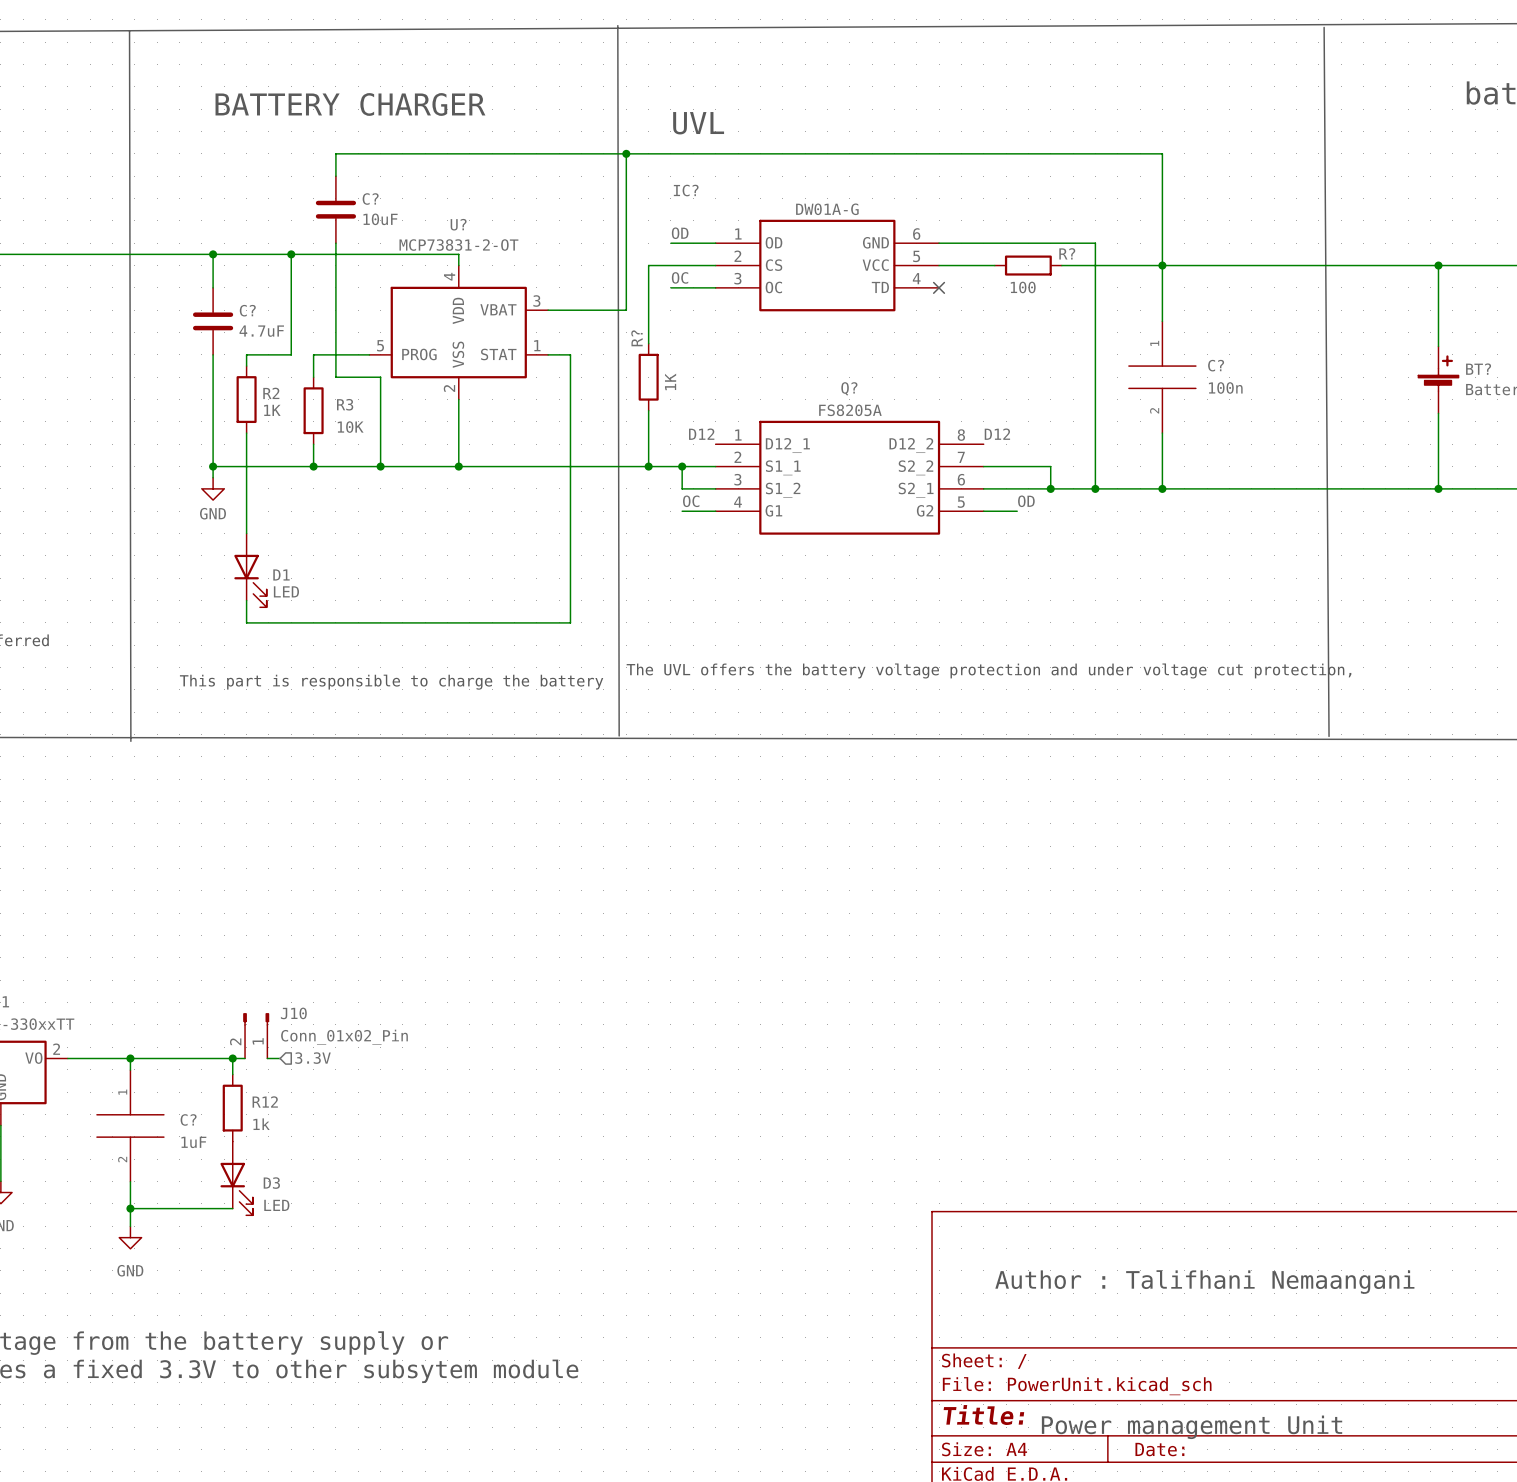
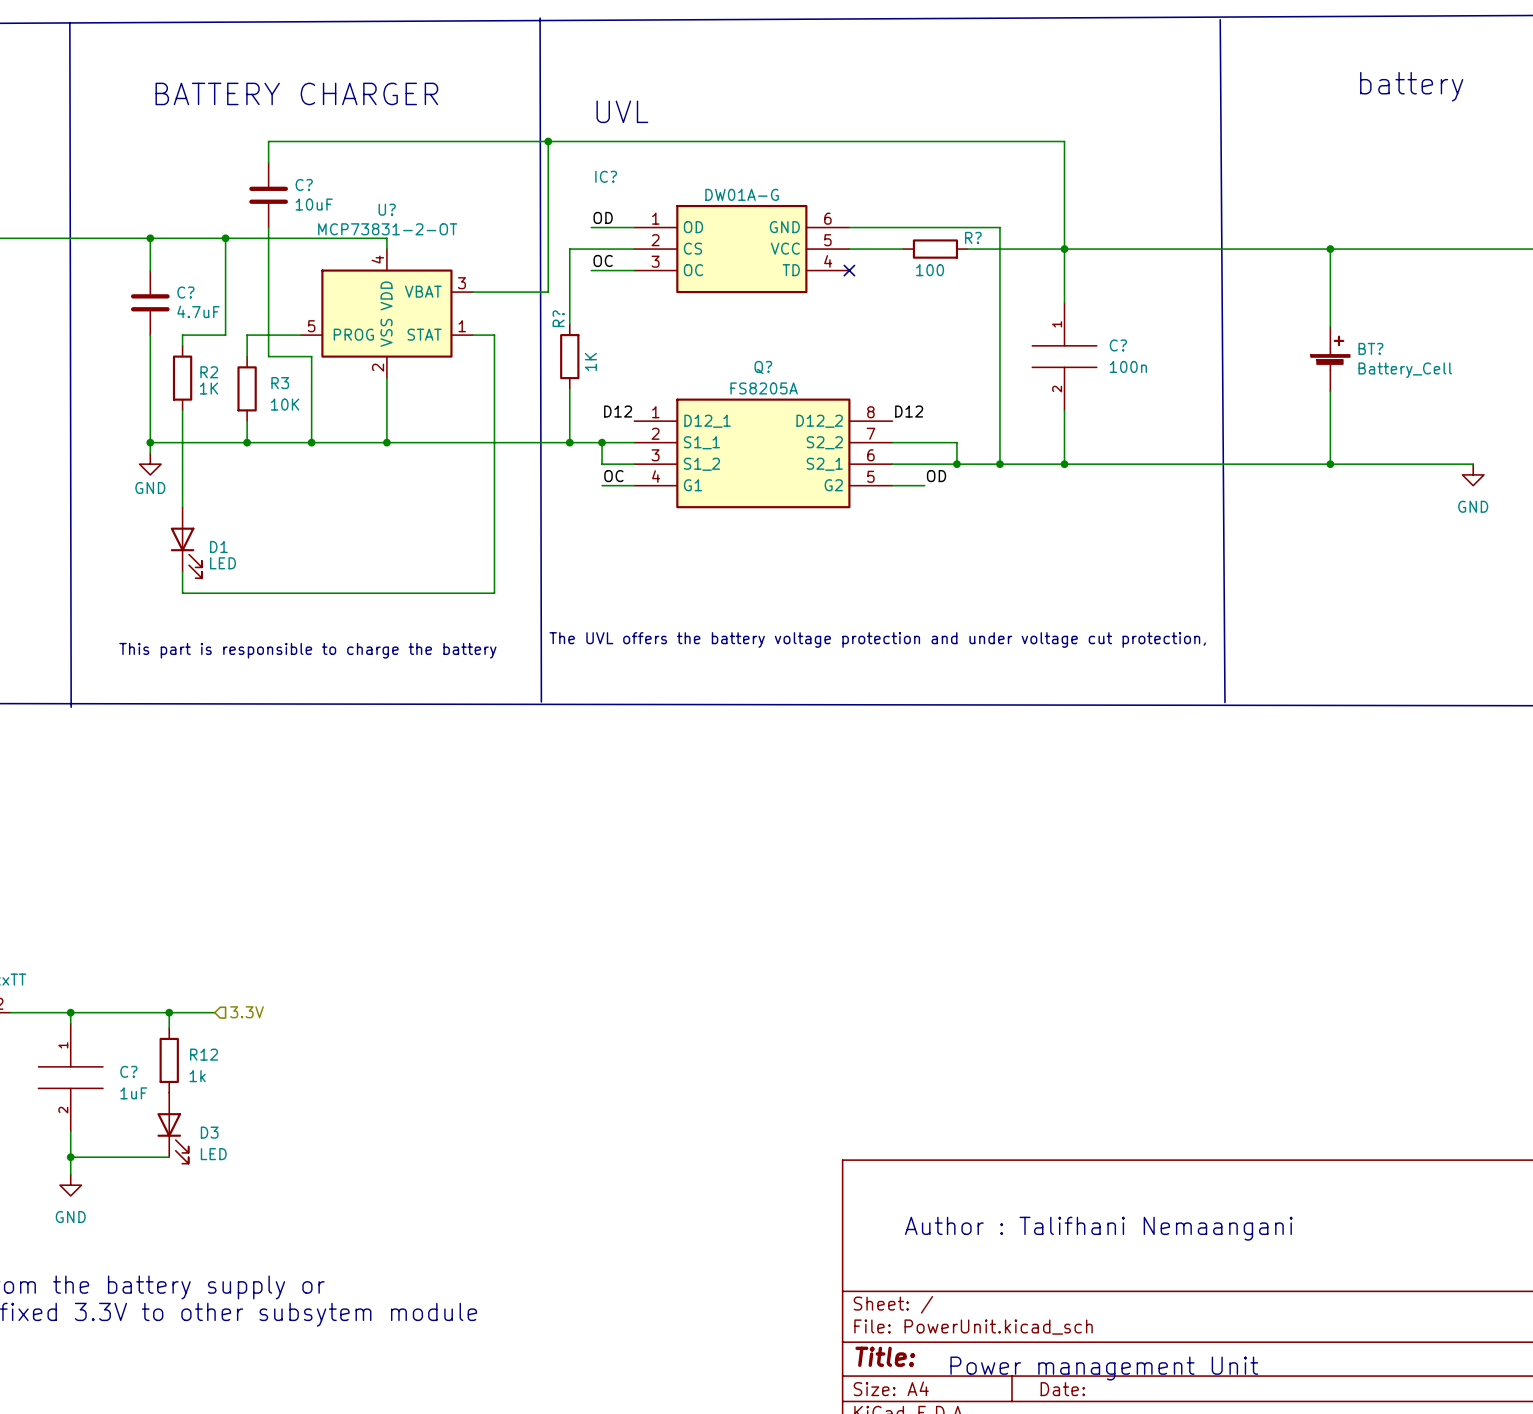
J10: Conn_01x02_Pin (256, 1035) -> none
wire: none -> (181, 1012) (202, 1012)

